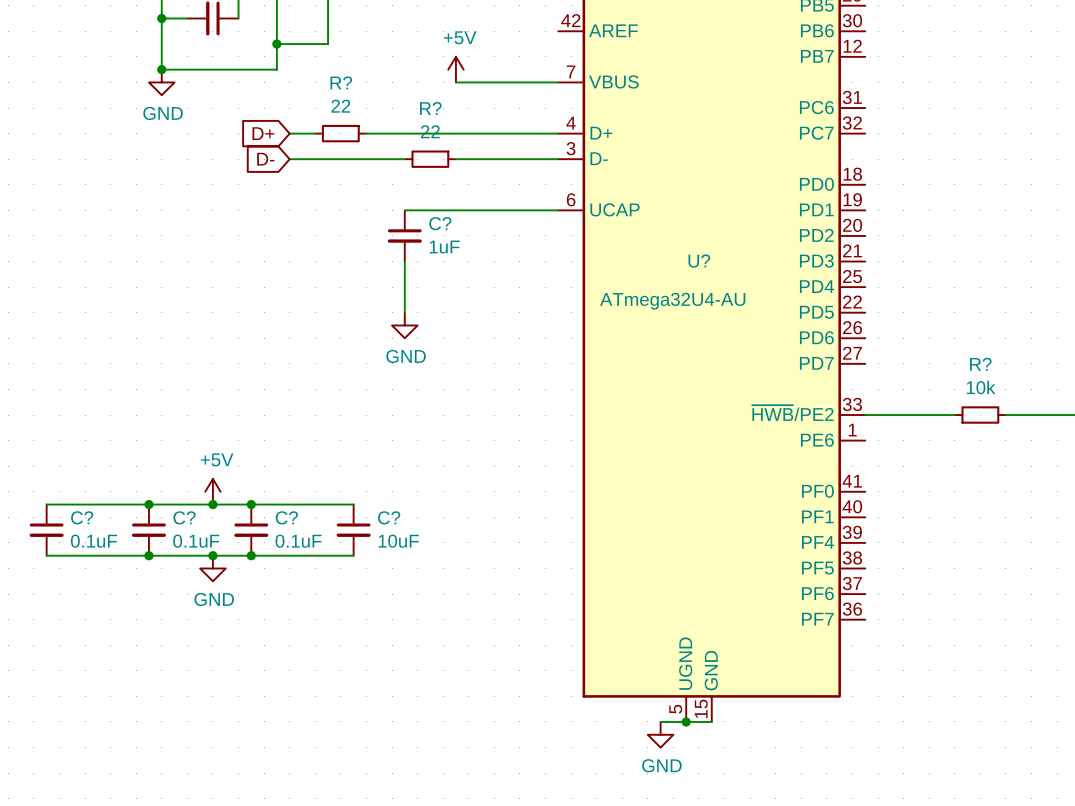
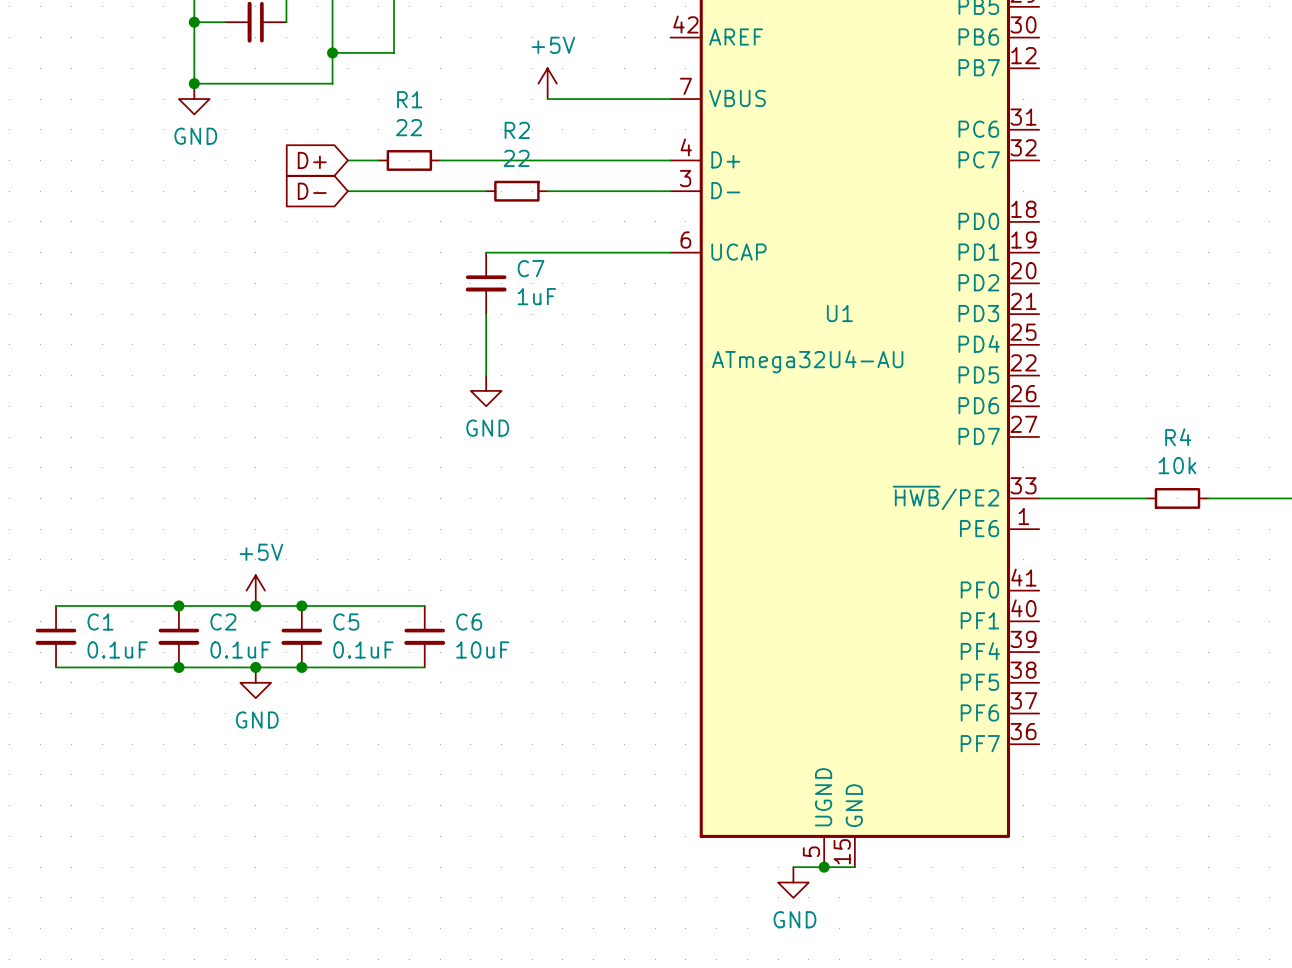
R? name: R? (341, 82) -> R1 (409, 99)
R? name: R? (430, 108) -> R2 (517, 130)
C? name: C? (440, 223) -> C7 (531, 268)
U? name: U? (699, 261) -> U1 (839, 313)
R? name: R? (980, 364) -> R4 (1178, 437)
C? name: C? (82, 517) -> C1 (100, 622)
C? name: C? (184, 517) -> C2 (223, 622)
C? name: C? (286, 517) -> C5 (346, 622)
C? name: C? (389, 517) -> C6 (469, 622)

